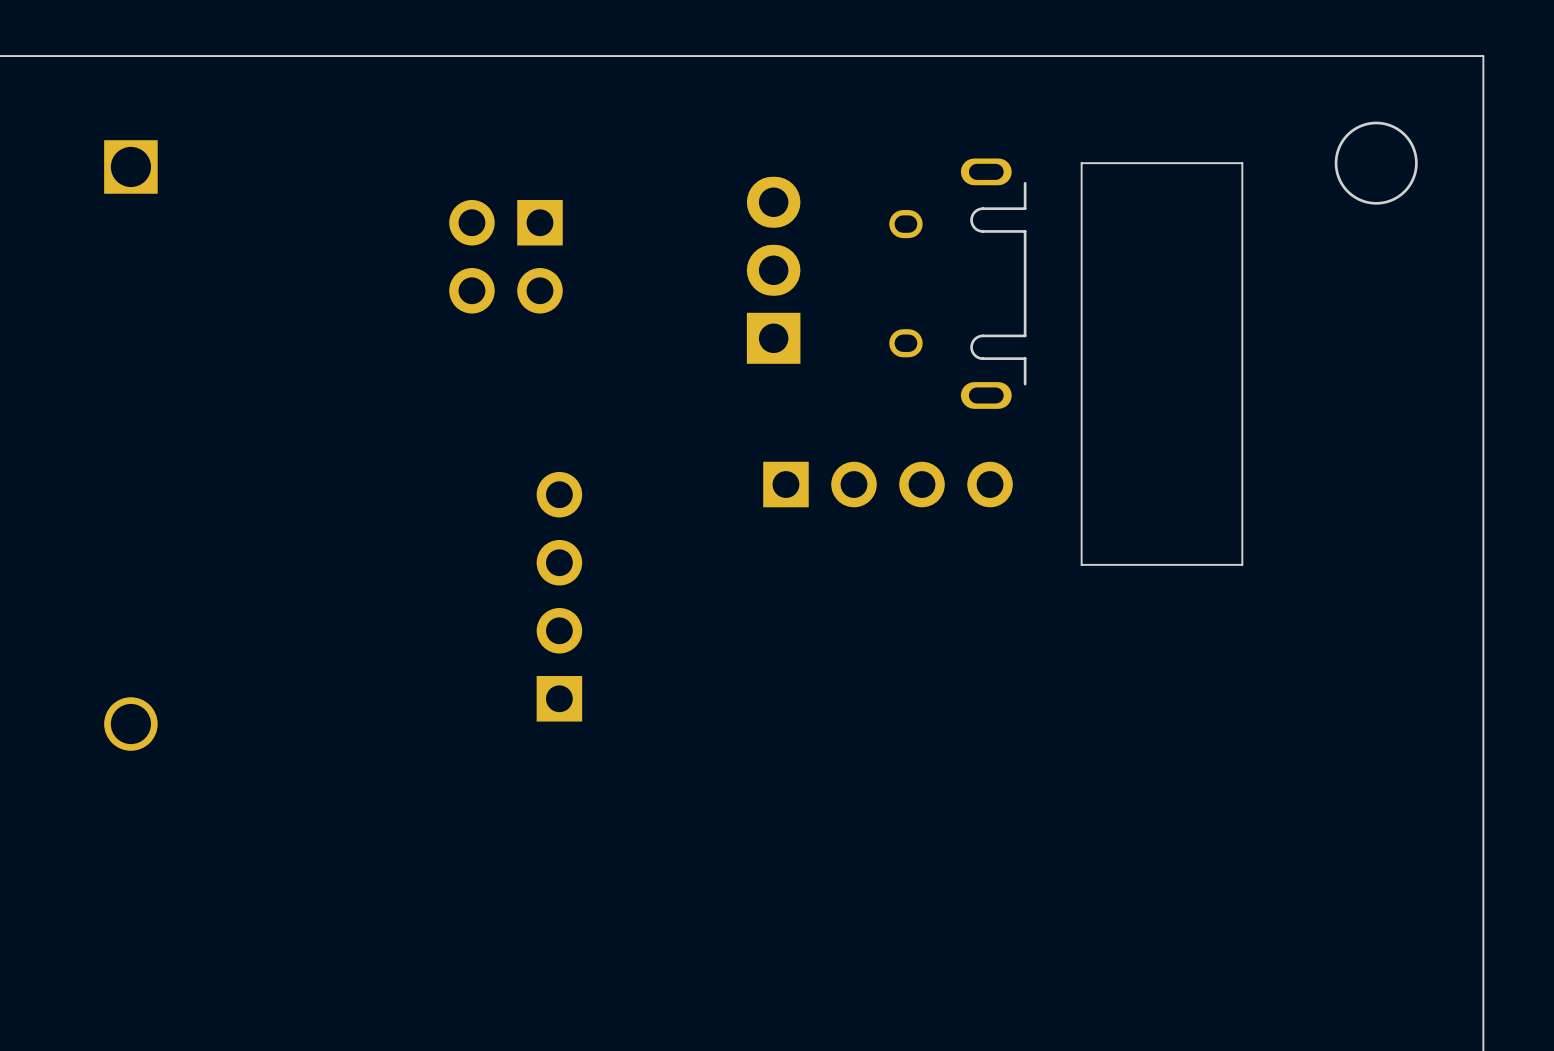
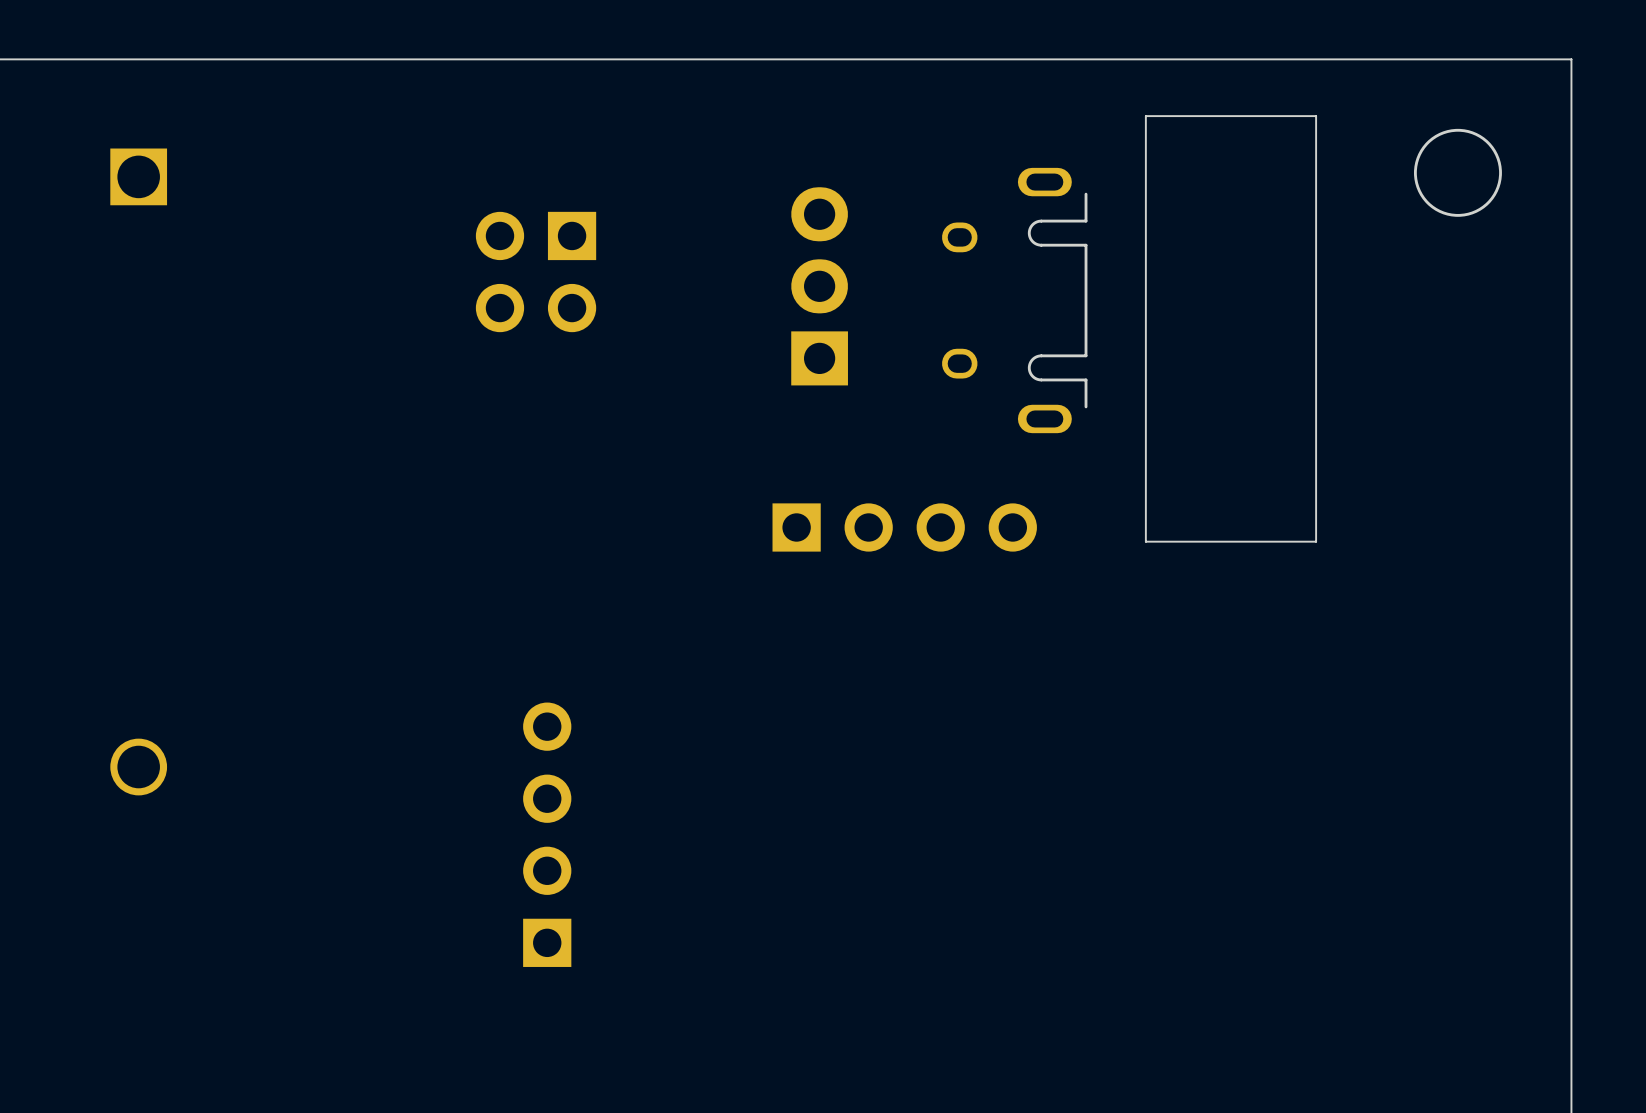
board edge: (1242, 163) (1081, 163) -> (1316, 172) (1316, 116) (1145, 116) (1145, 172)
part position: (888, 484) -> (904, 527)
board edge: (1242, 511) (1242, 564) (1081, 564) (1081, 511) -> (1316, 541) (1145, 541)
part: (559, 596) -> none
part: none -> (547, 834)

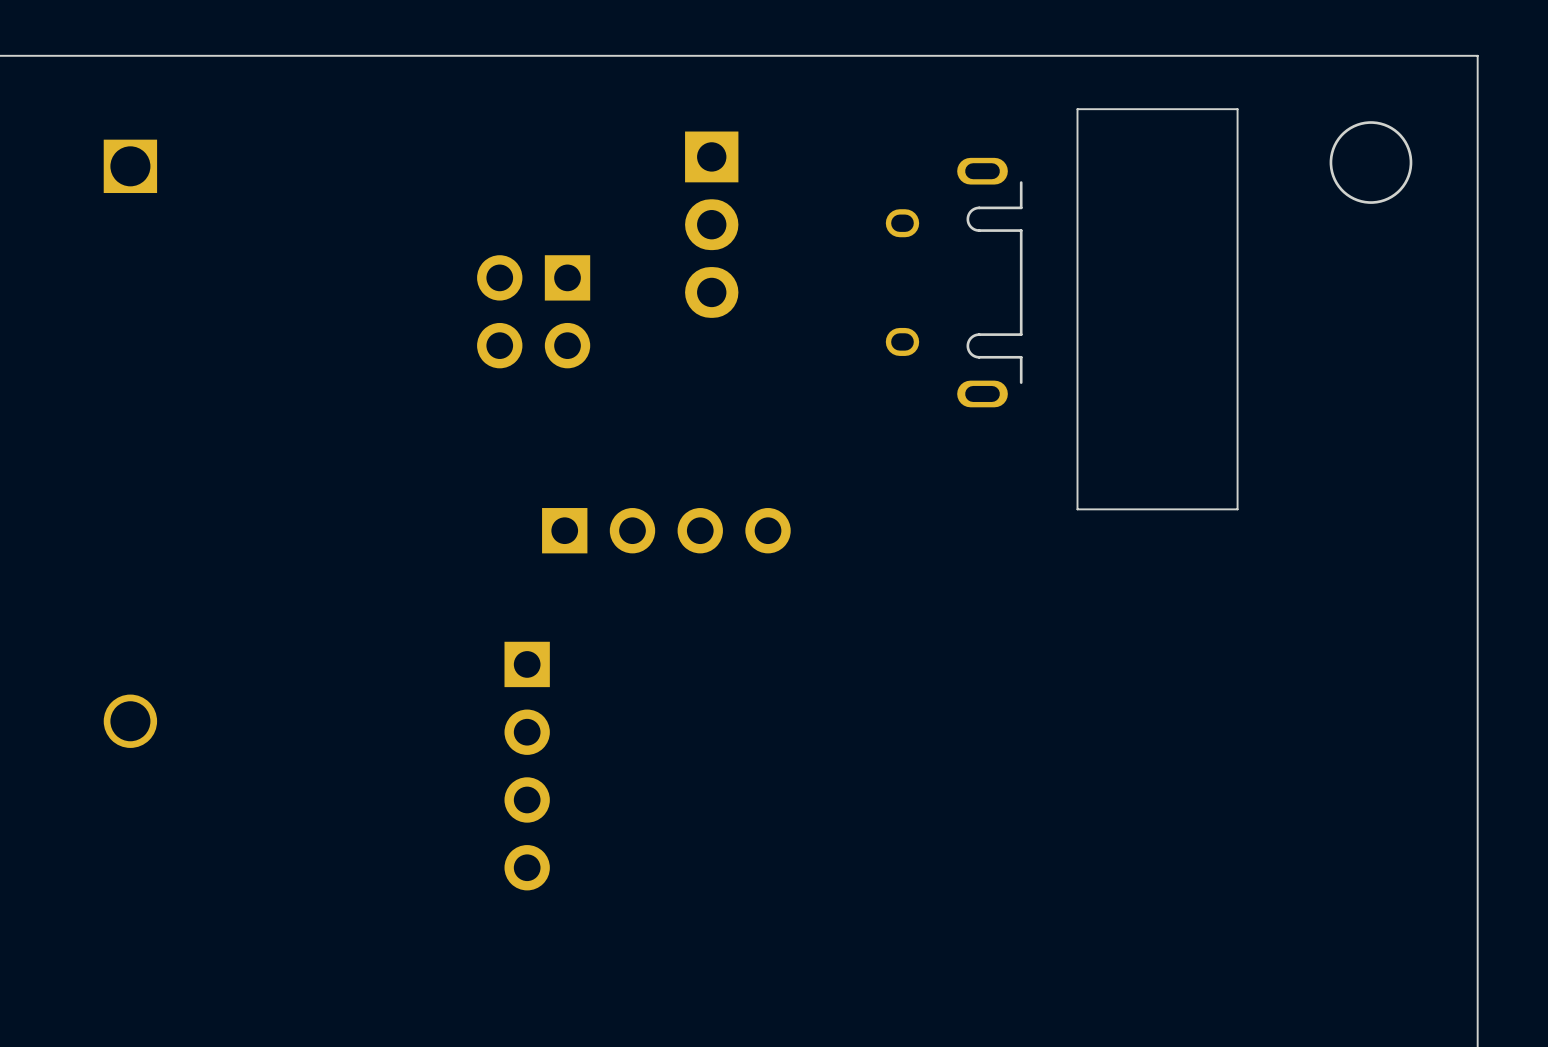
part position: (536, 272) -> (533, 311)
part rotation: 0° (819, 286) -> 180° (711, 224)
part position: (904, 527) -> (666, 530)
part rotation: 0° (547, 834) -> 180° (527, 766)

